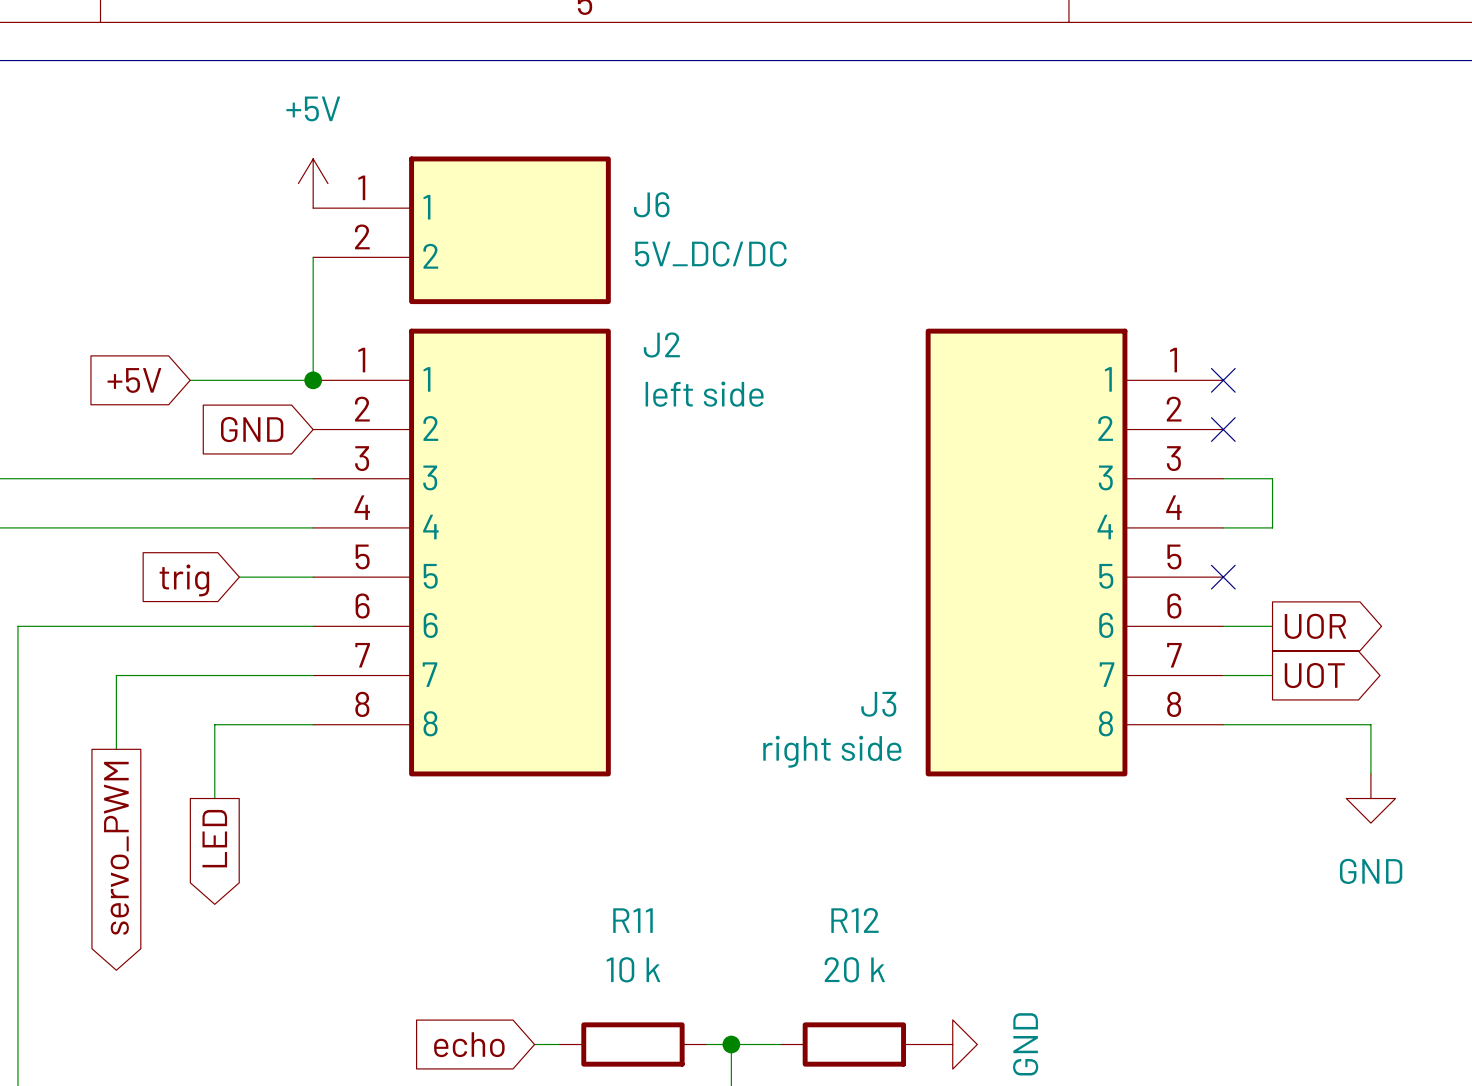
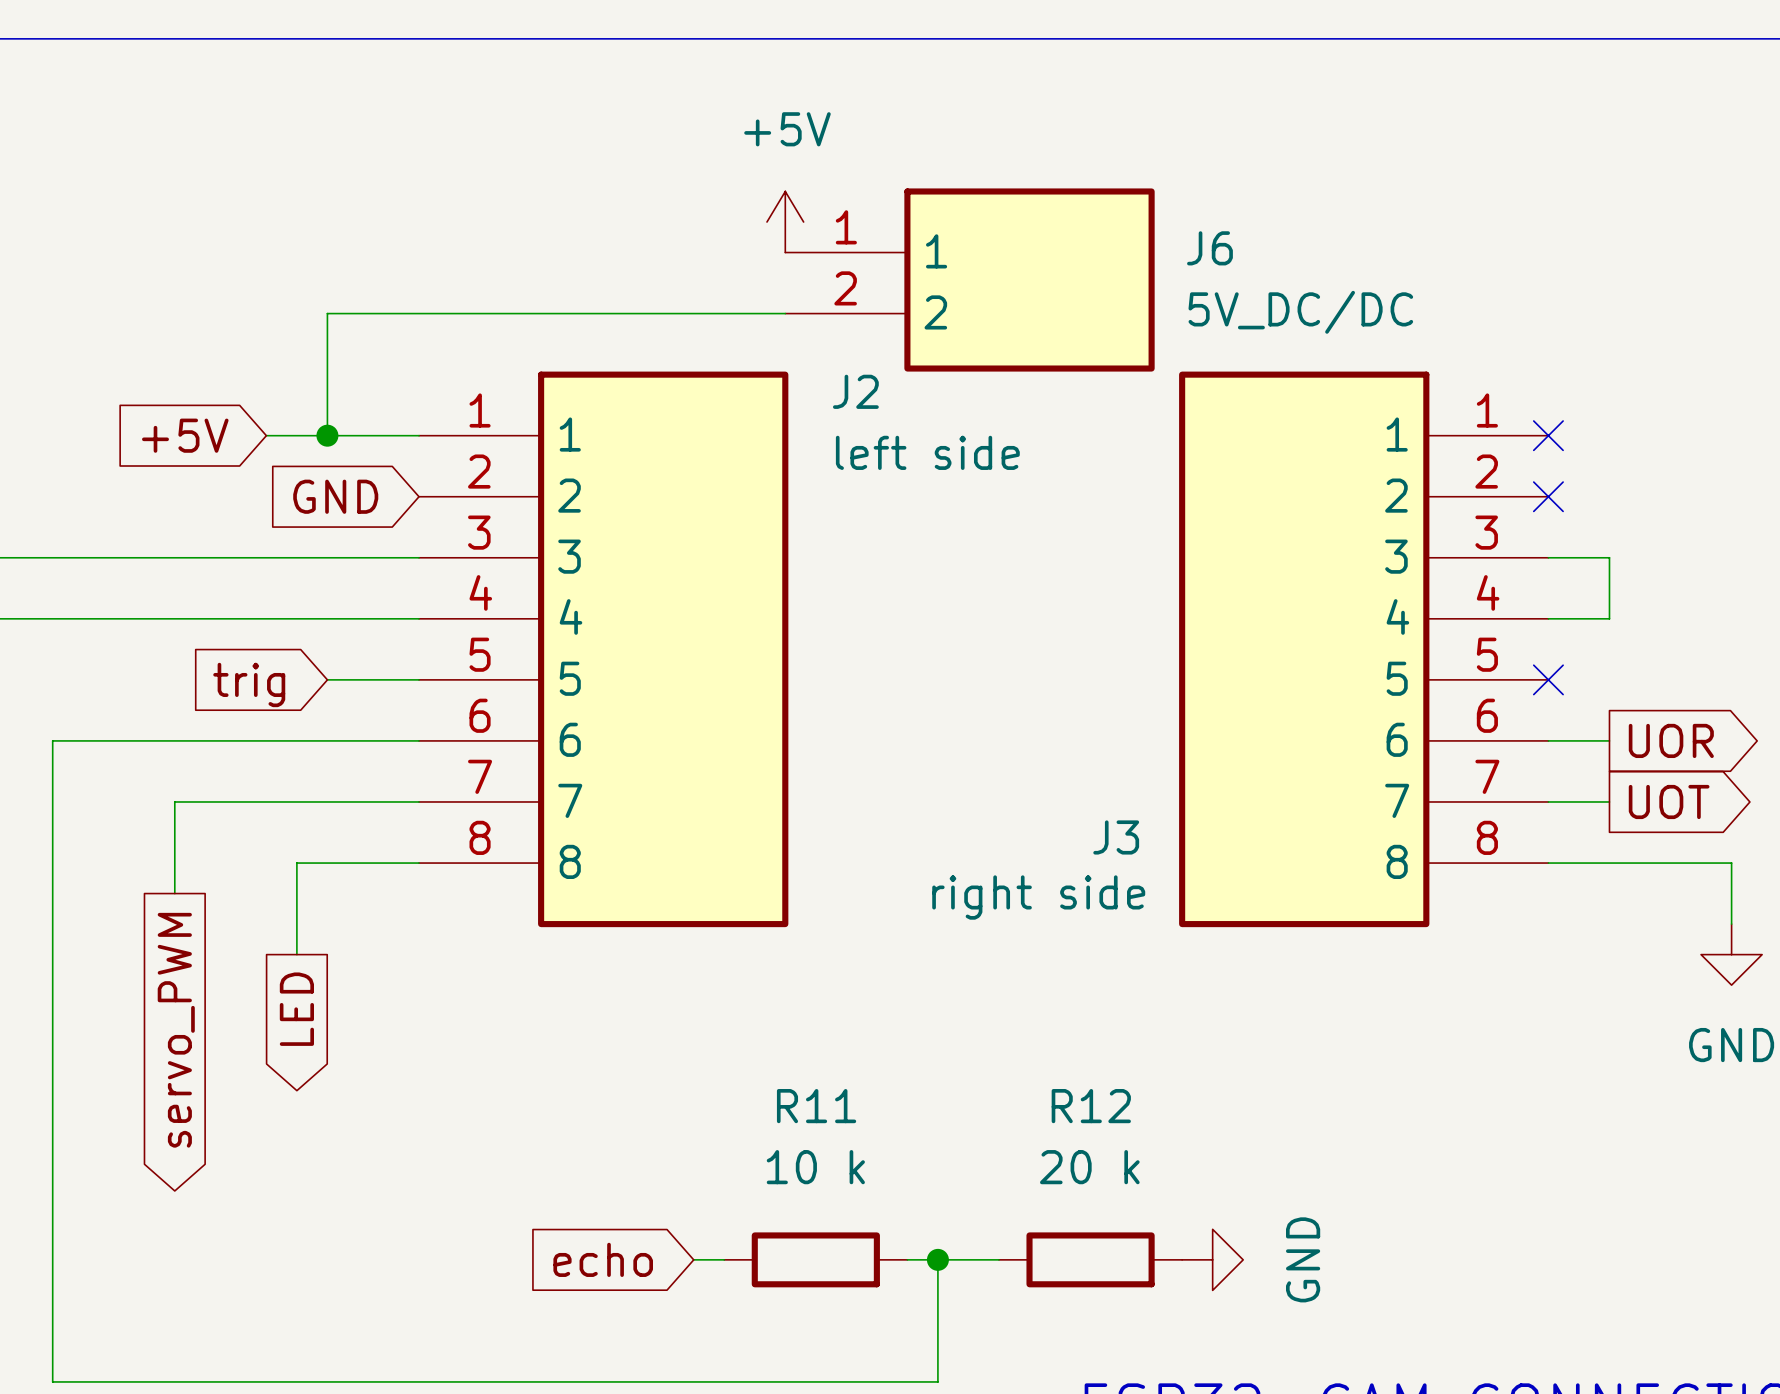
power symbol position: +5V (313, 183) -> +5V (785, 222)
J6 position: (462, 230) -> (969, 280)
wire: (313, 257) (313, 380) -> none
wire: none -> (785, 313) (327, 313) (327, 435)
junction position: (313, 380) -> (327, 435)

